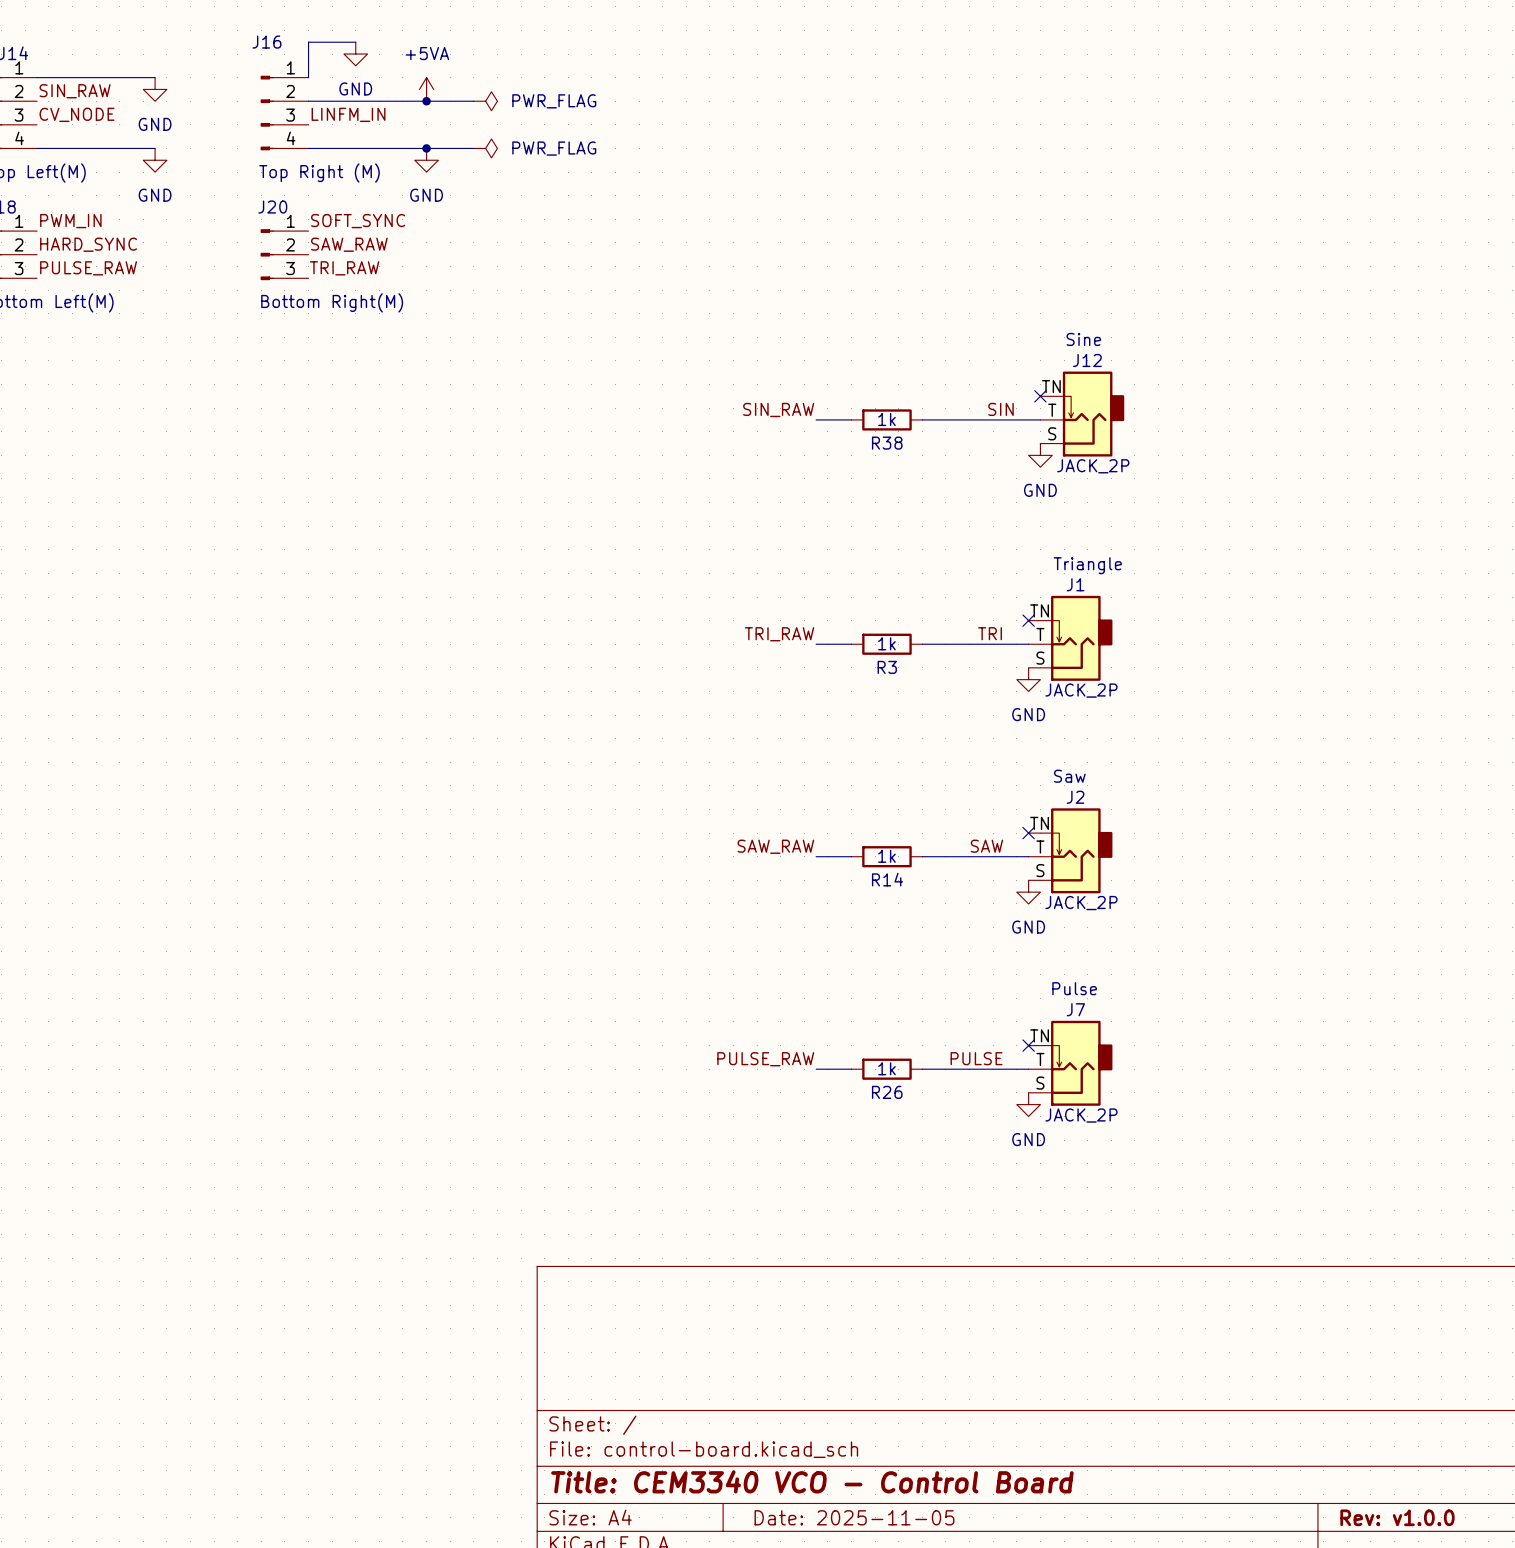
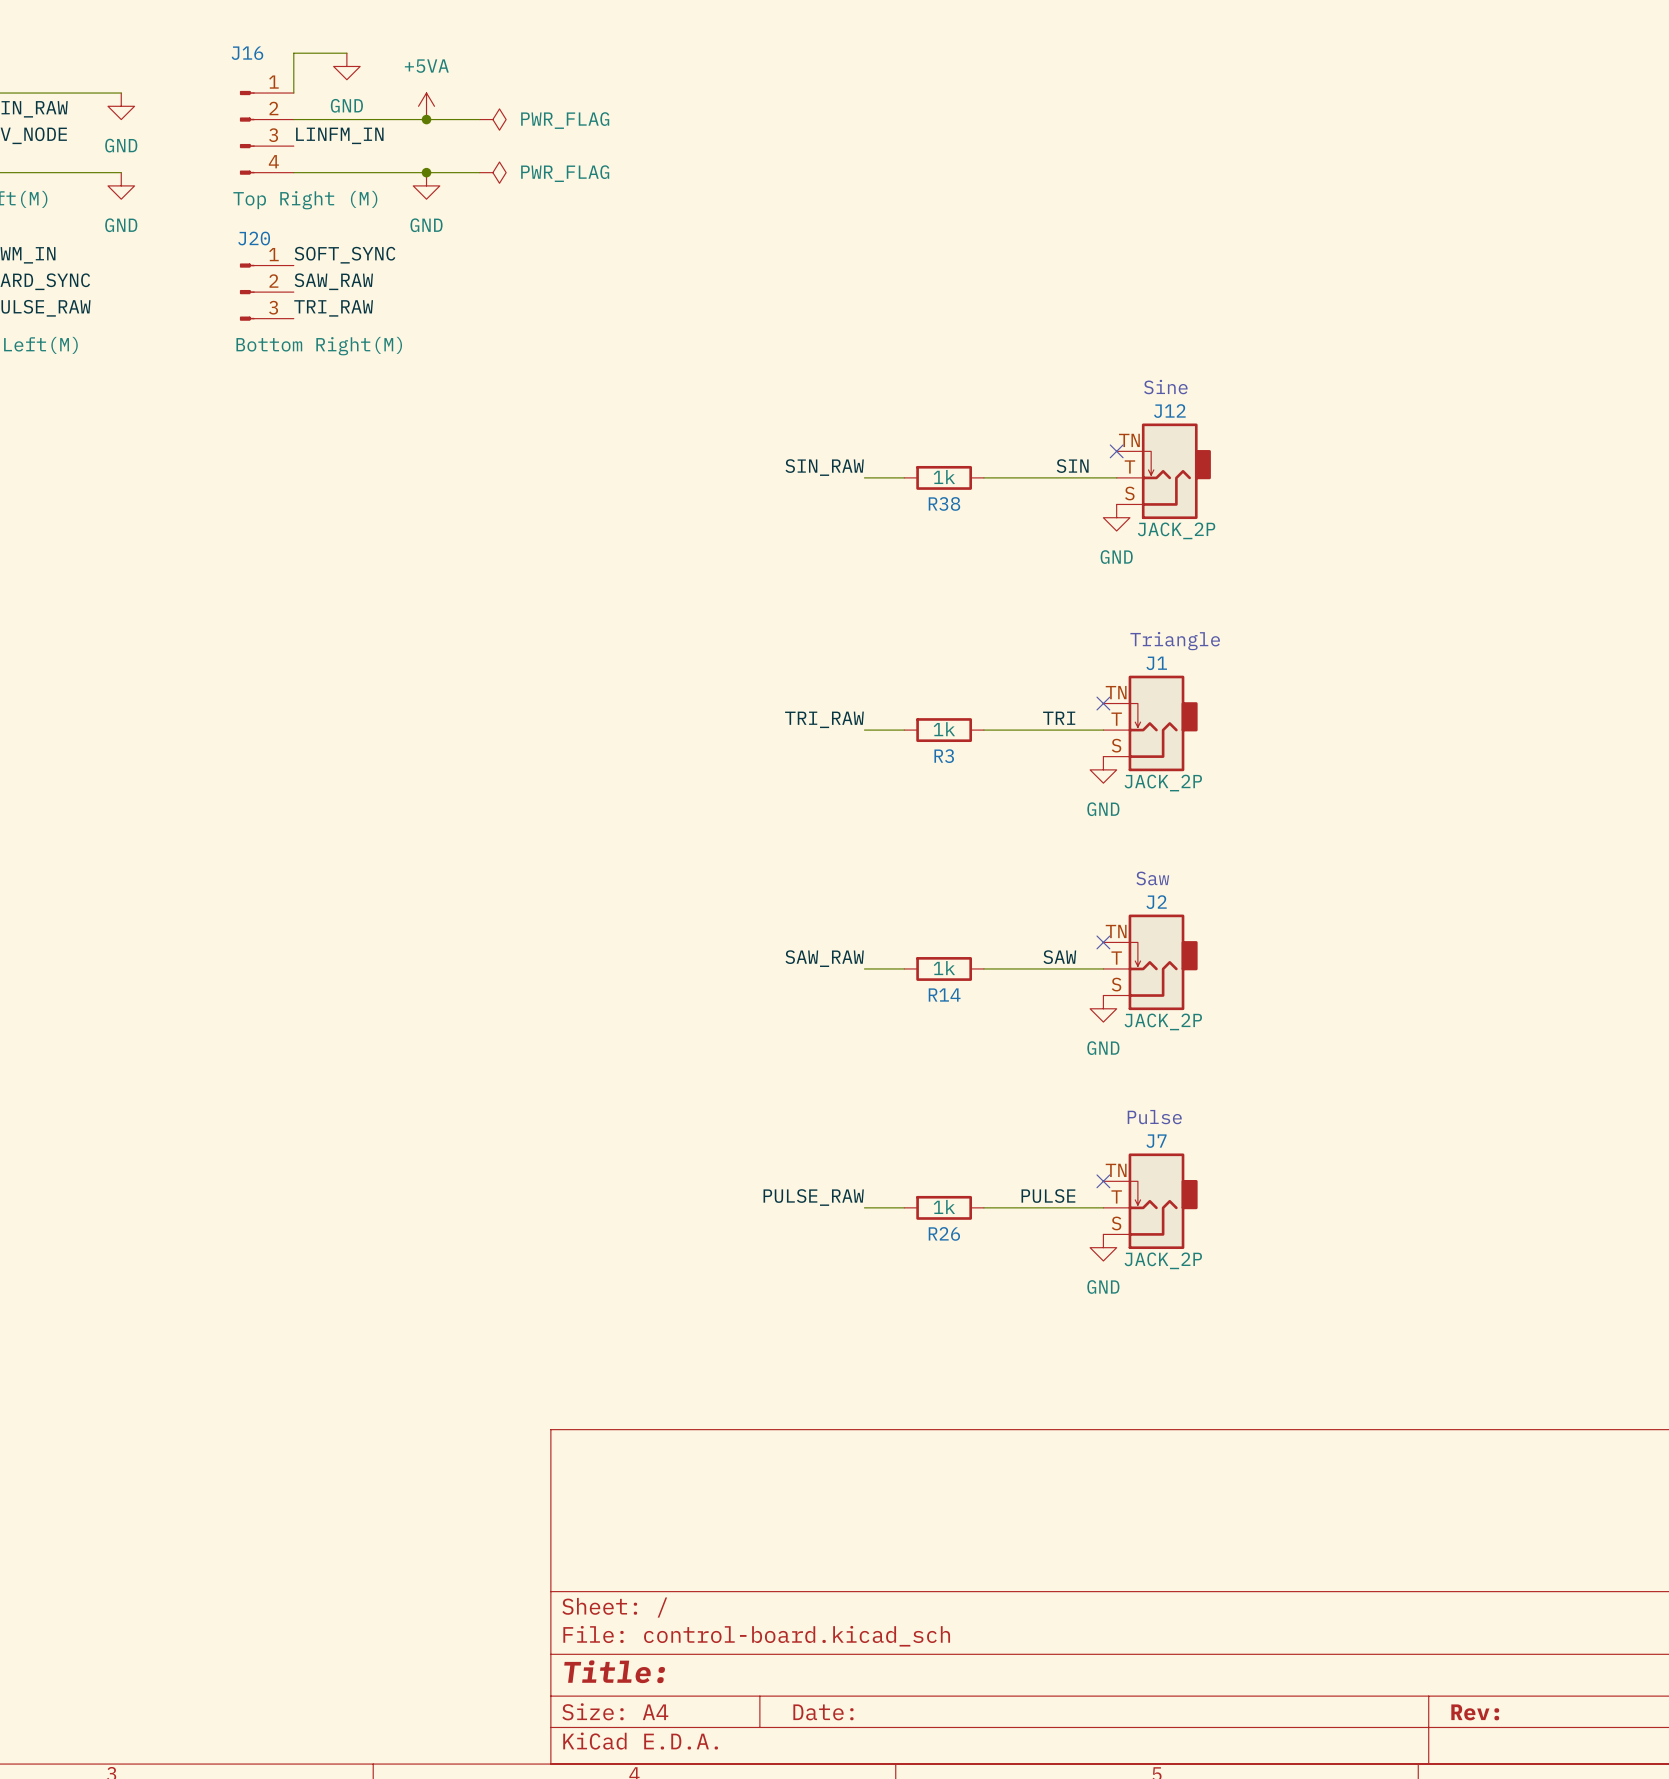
title block: Title: CEM3340 VCO - Control Board (812, 1481) -> Title: (614, 1671)
title block: Date: 2025-11-05 (854, 1517) -> Date: (823, 1712)
title block: Rev: v1.0.0 (1397, 1517) -> Rev: (1475, 1712)

